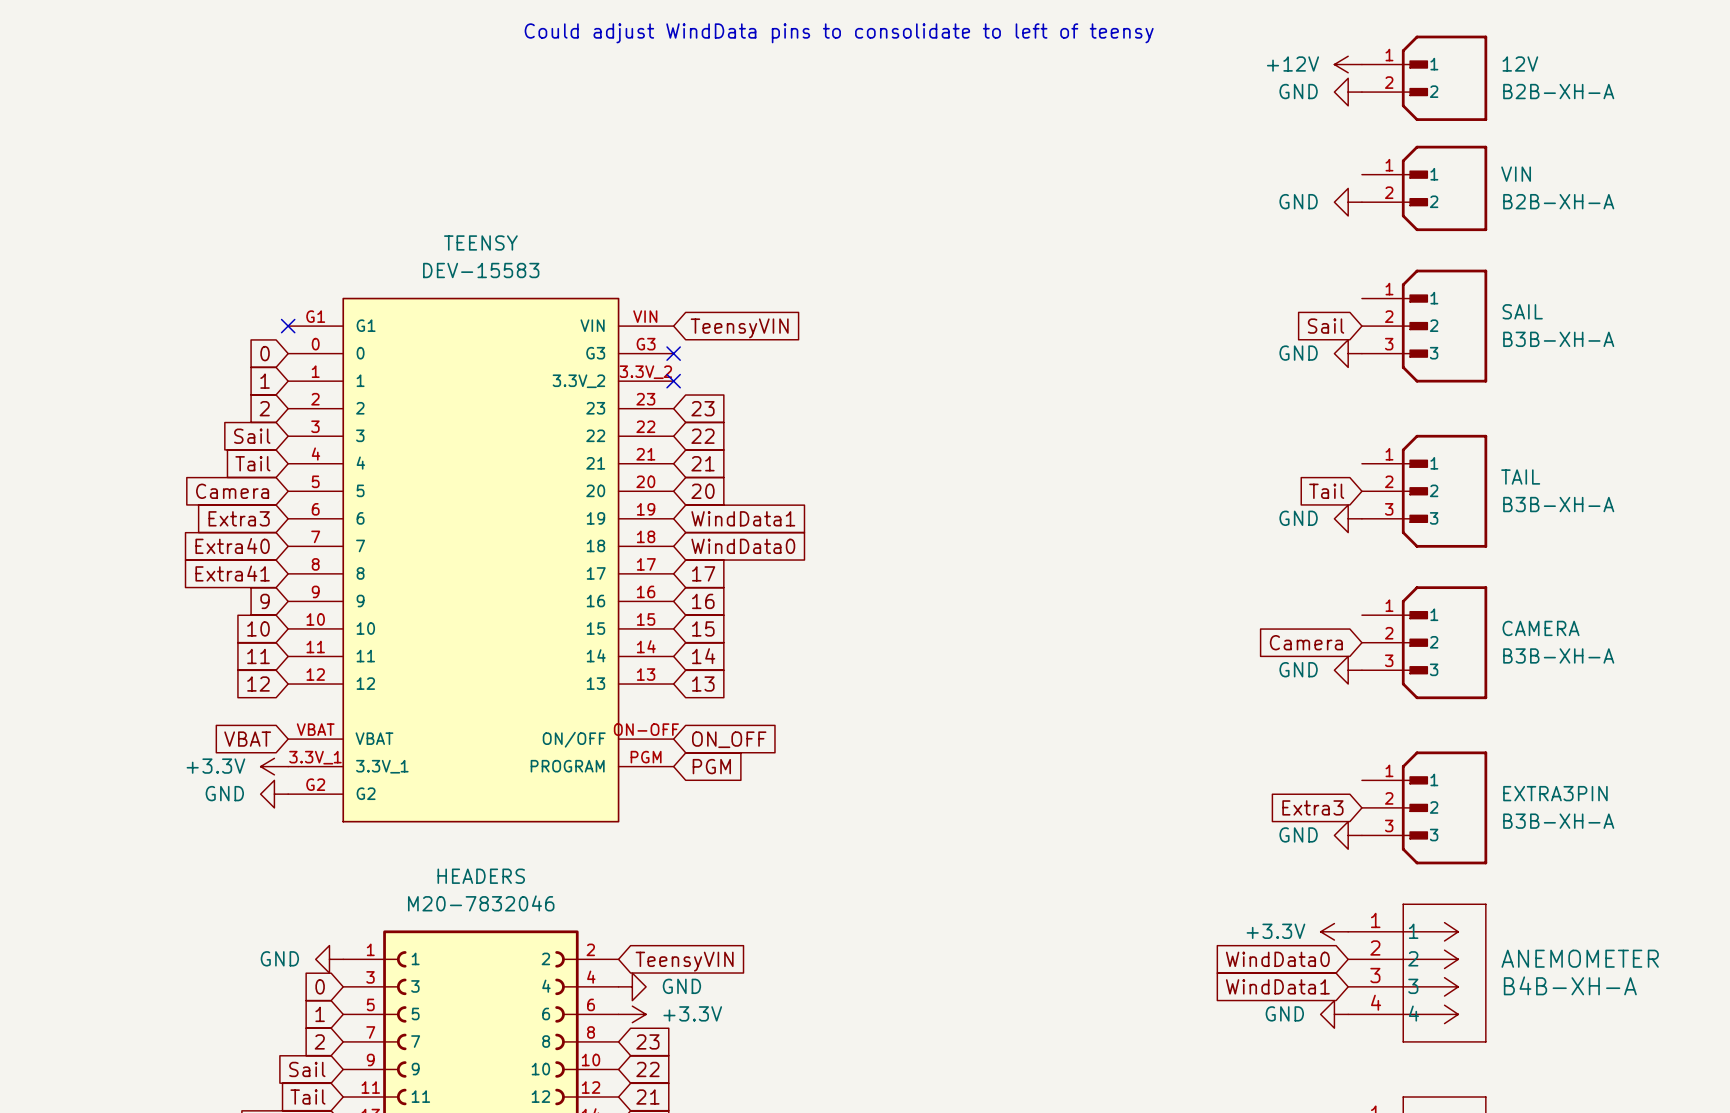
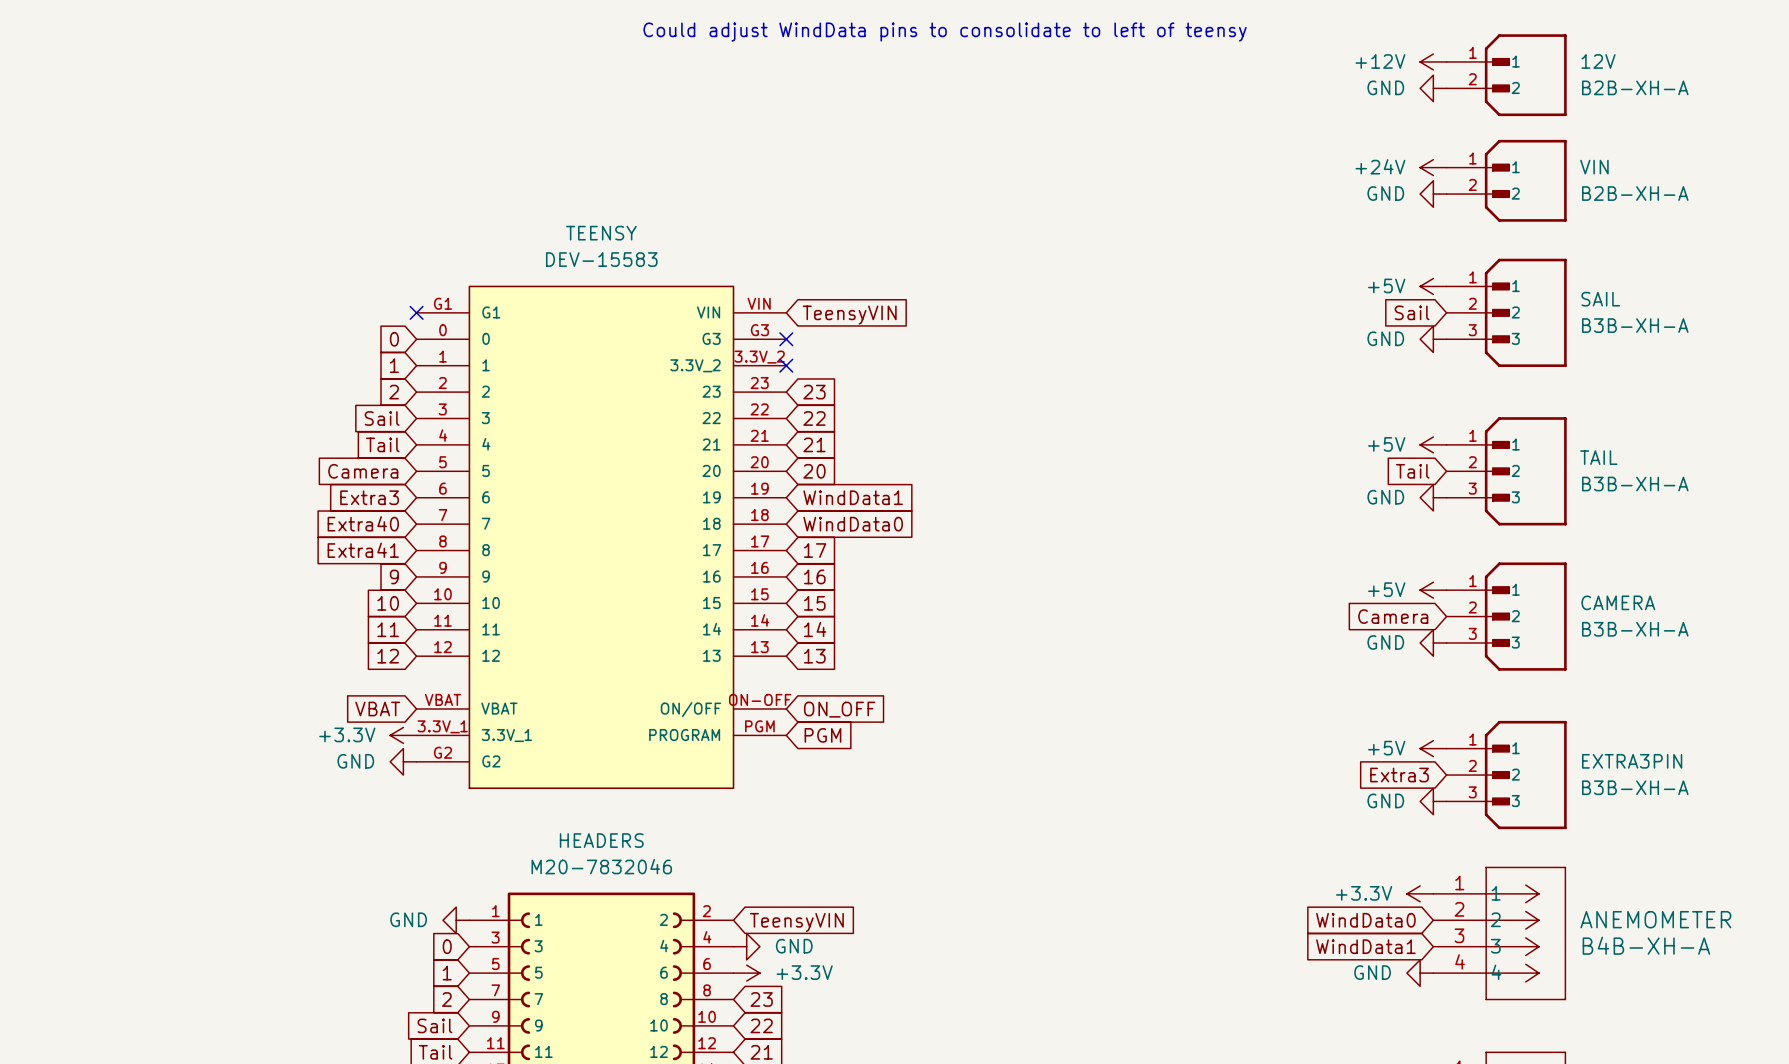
power symbol: none -> +24V (1433, 167)
power symbol: none -> +5V (1433, 286)
power symbol: none -> +5V (1433, 444)
power symbol: none -> +5V (1433, 590)
power symbol: none -> +5V (1433, 748)

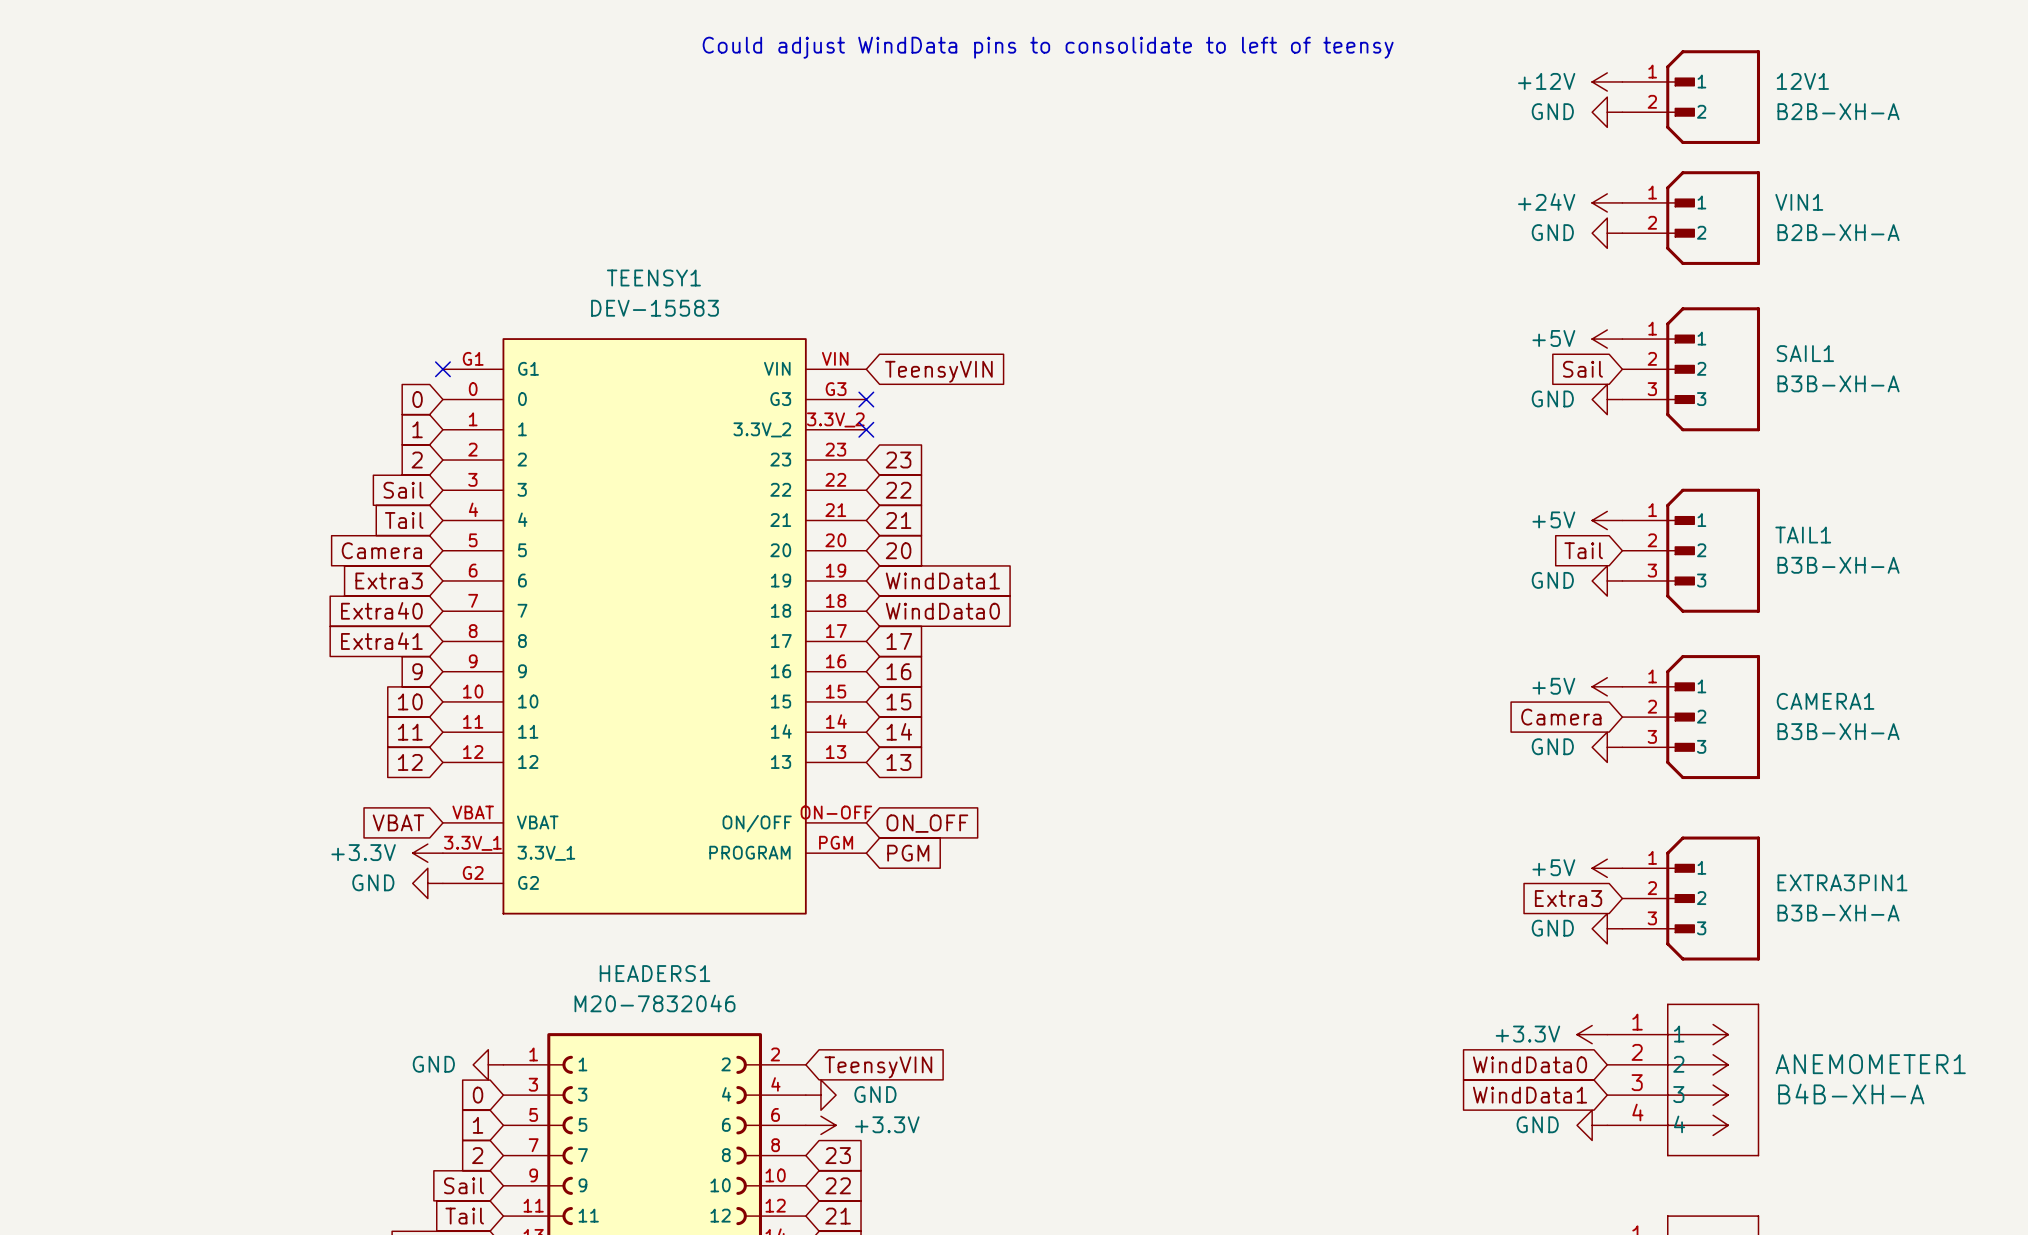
12V name: 12V (1598, 61) -> 12V1 (1802, 81)
VIN name: VIN (1594, 167) -> VIN1 (1799, 202)
TEENSY name: TEENSY (601, 233) -> TEENSY1 (653, 277)
SAIL name: SAIL (1600, 299) -> SAIL1 (1805, 353)
TAIL name: TAIL (1598, 457) -> TAIL1 (1803, 535)
CAMERA name: CAMERA (1618, 602) -> CAMERA1 (1825, 701)
EXTRA3PIN name: EXTRA3PIN (1632, 761) -> EXTRA3PIN1 (1842, 882)
HEADERS name: HEADERS (601, 840) -> HEADERS1 (655, 973)
ANEMOMETER name: ANEMOMETER (1655, 919) -> ANEMOMETER1 (1870, 1064)

